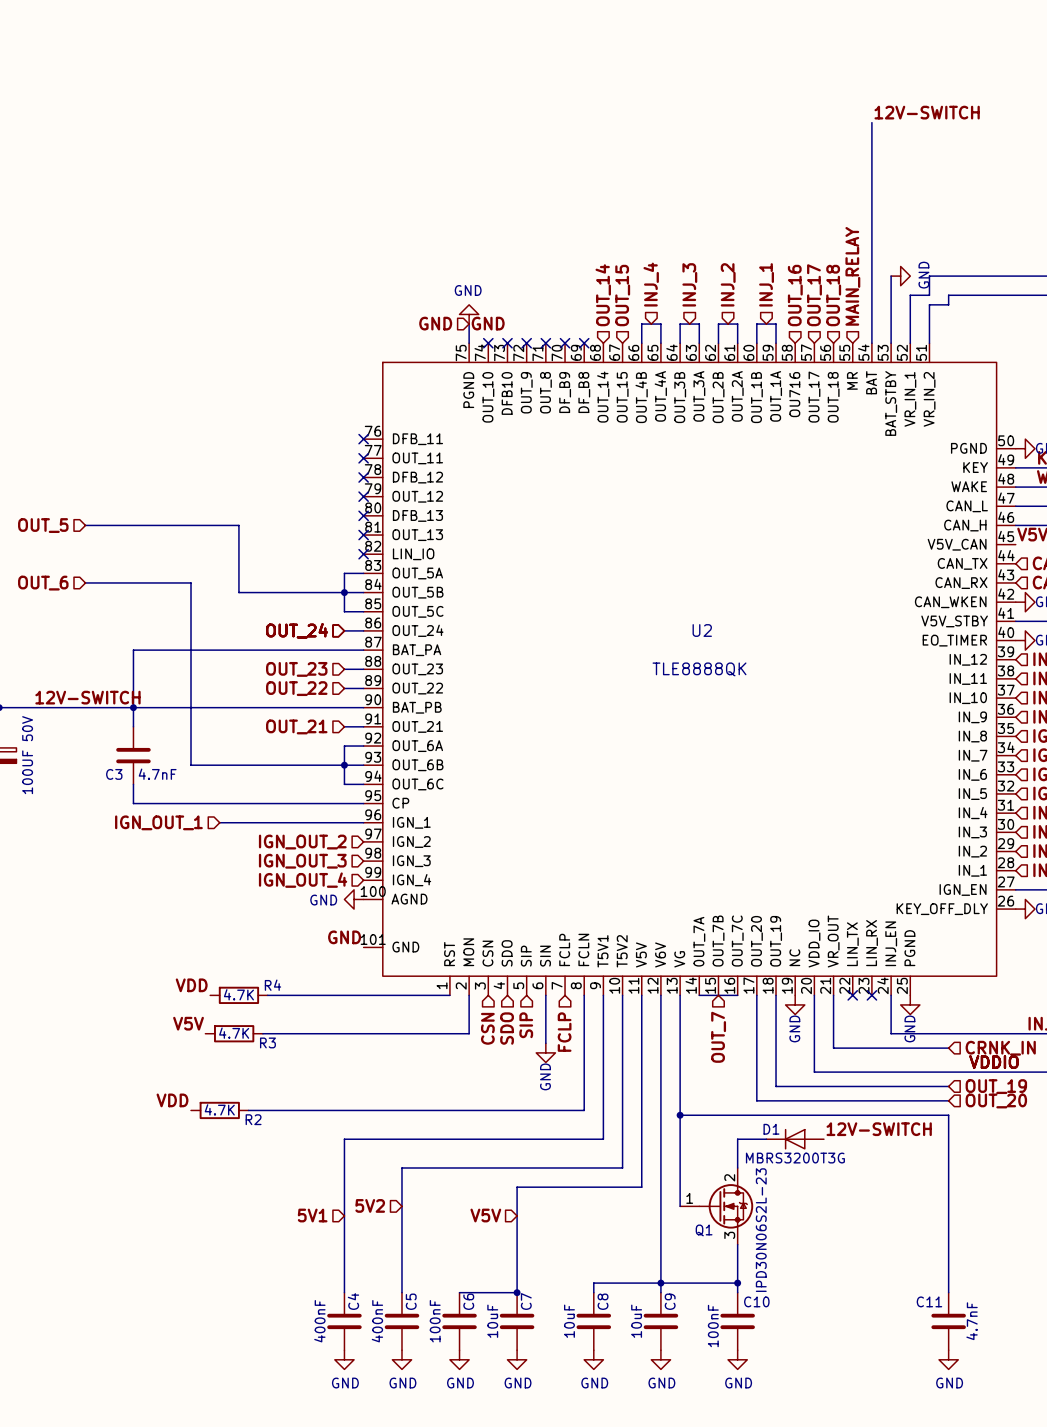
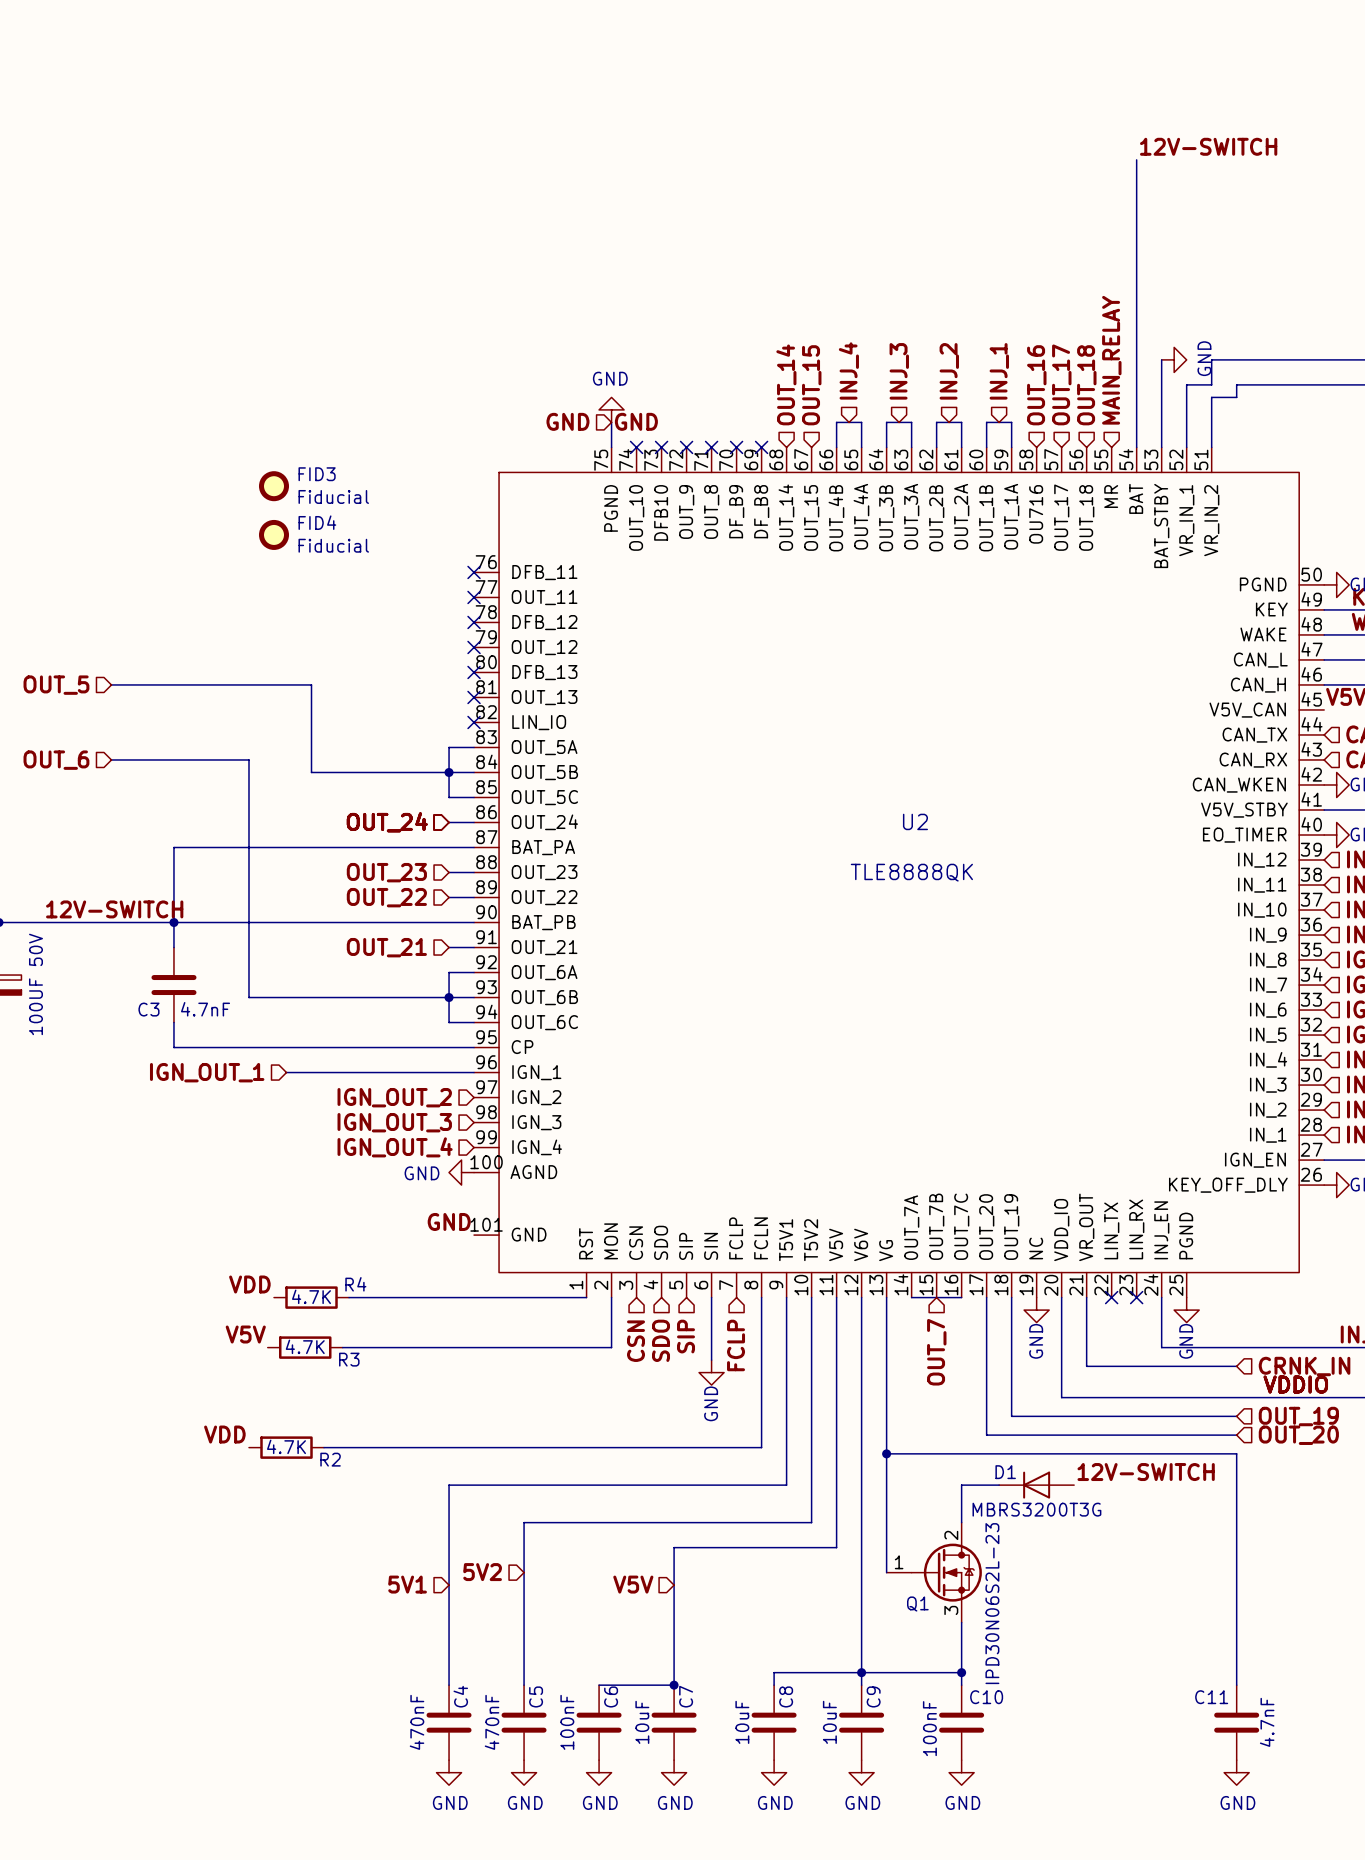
FID3: none -> Fiducial (274, 486)
FID4: none -> Fiducial (274, 534)
C4 value: 400nF (319, 1321) -> 470nF (417, 1722)
C5 value: 400nF (377, 1321) -> 470nF (492, 1722)

